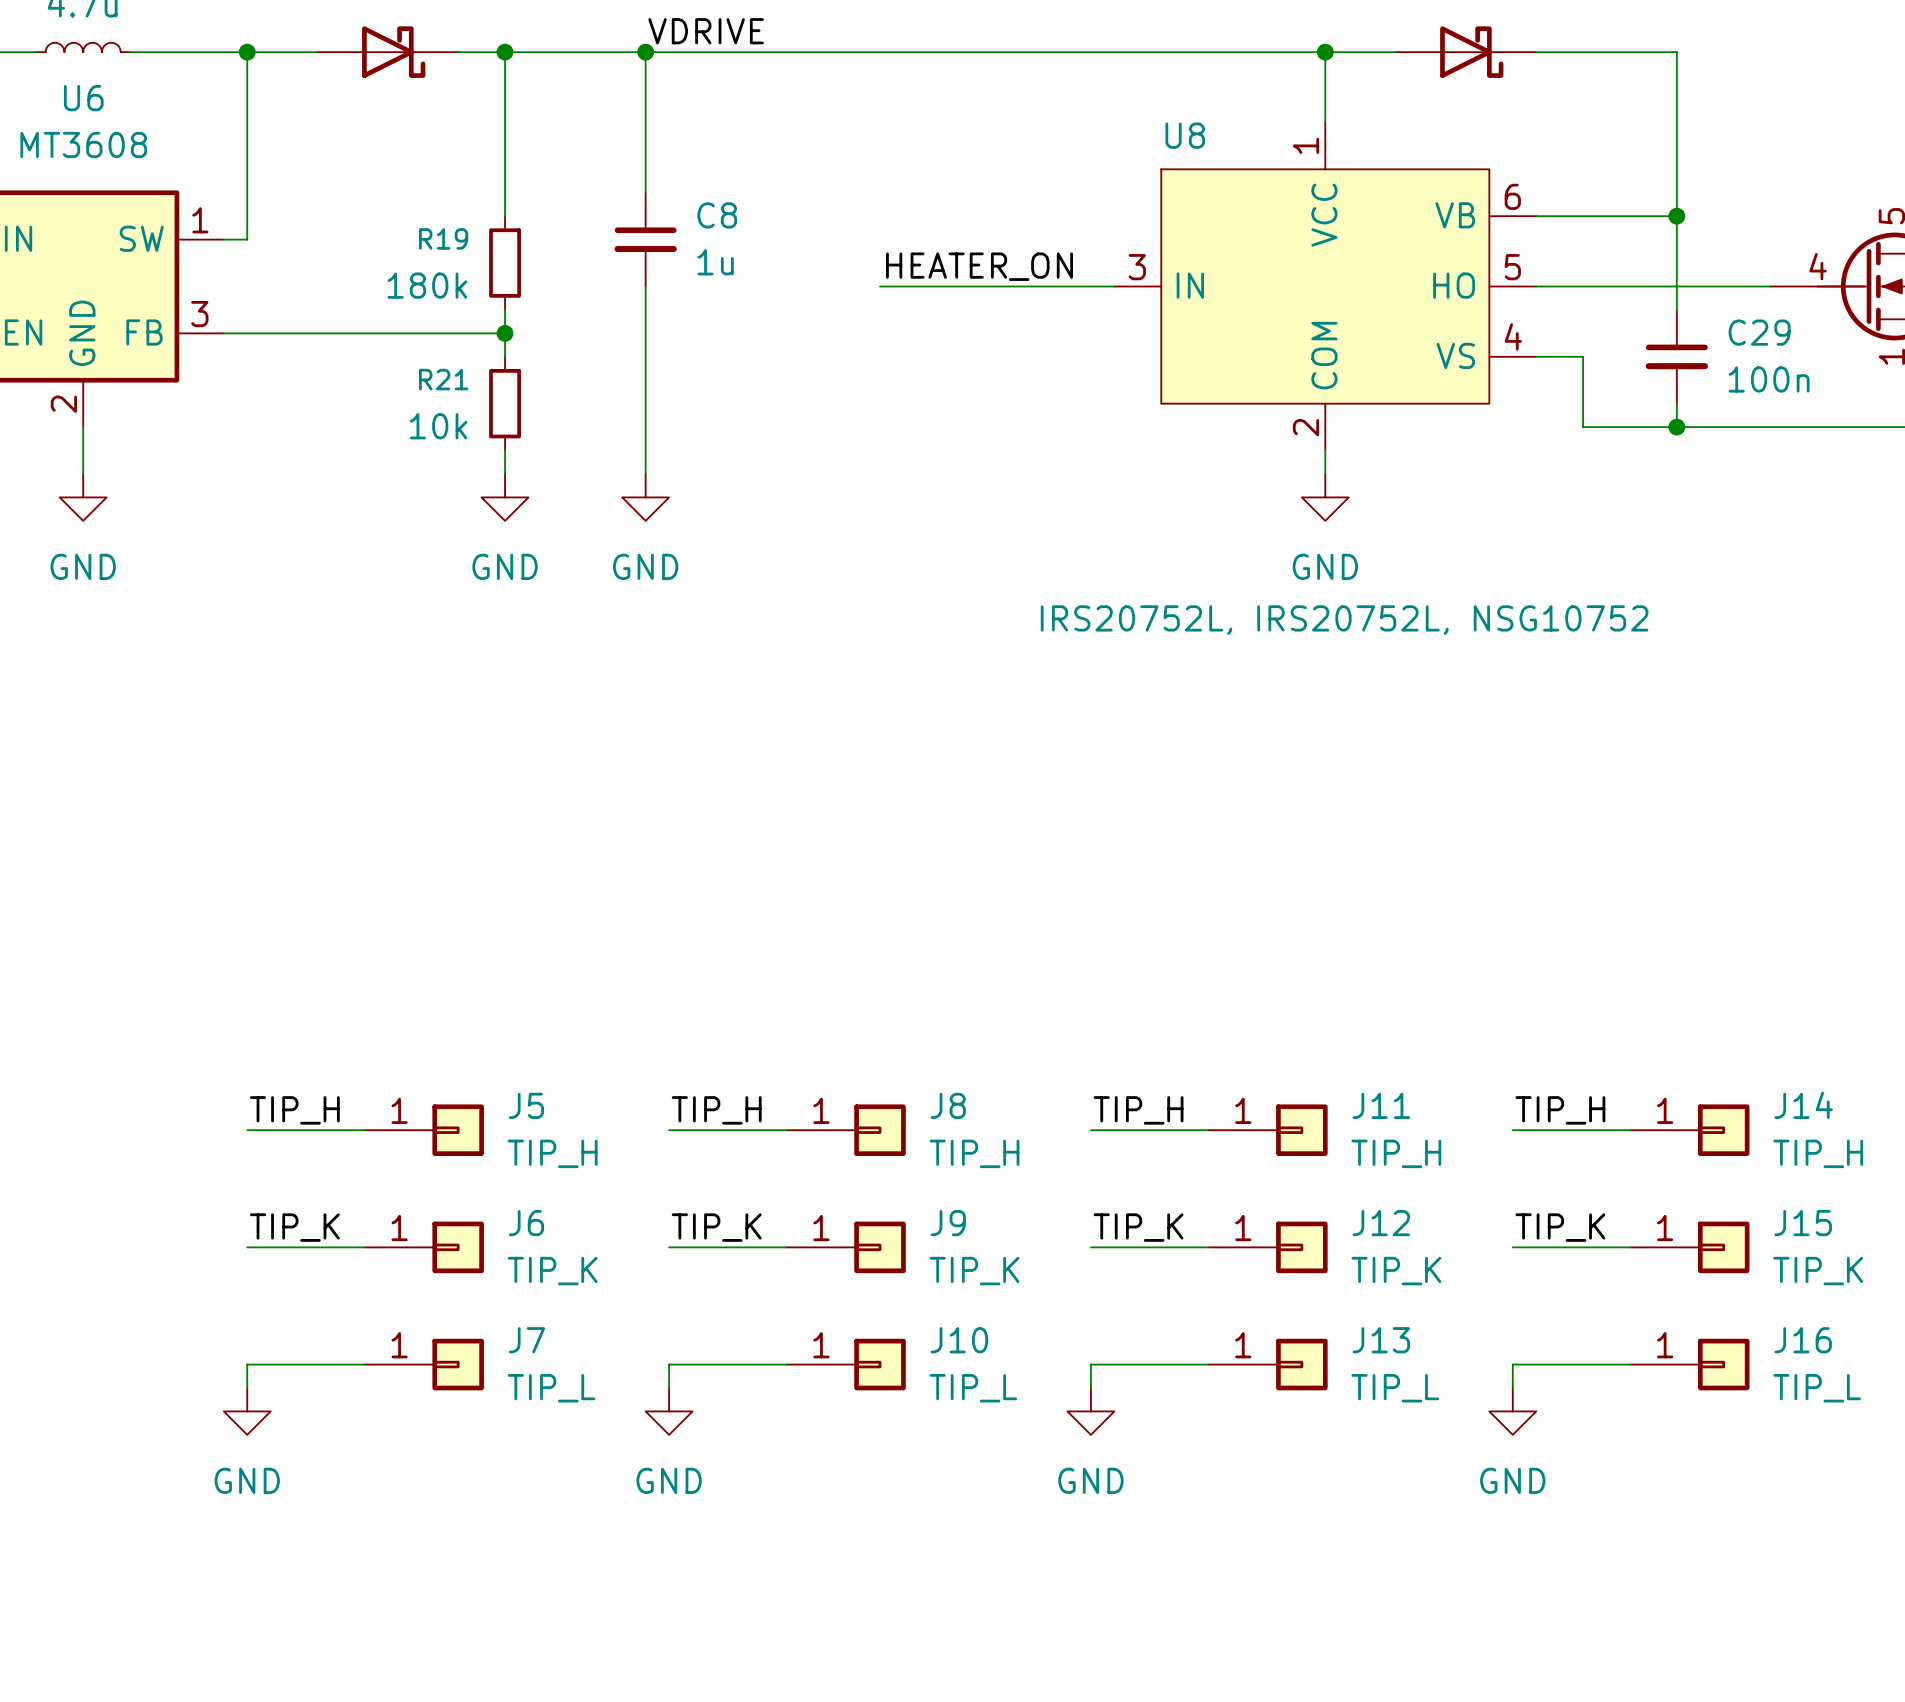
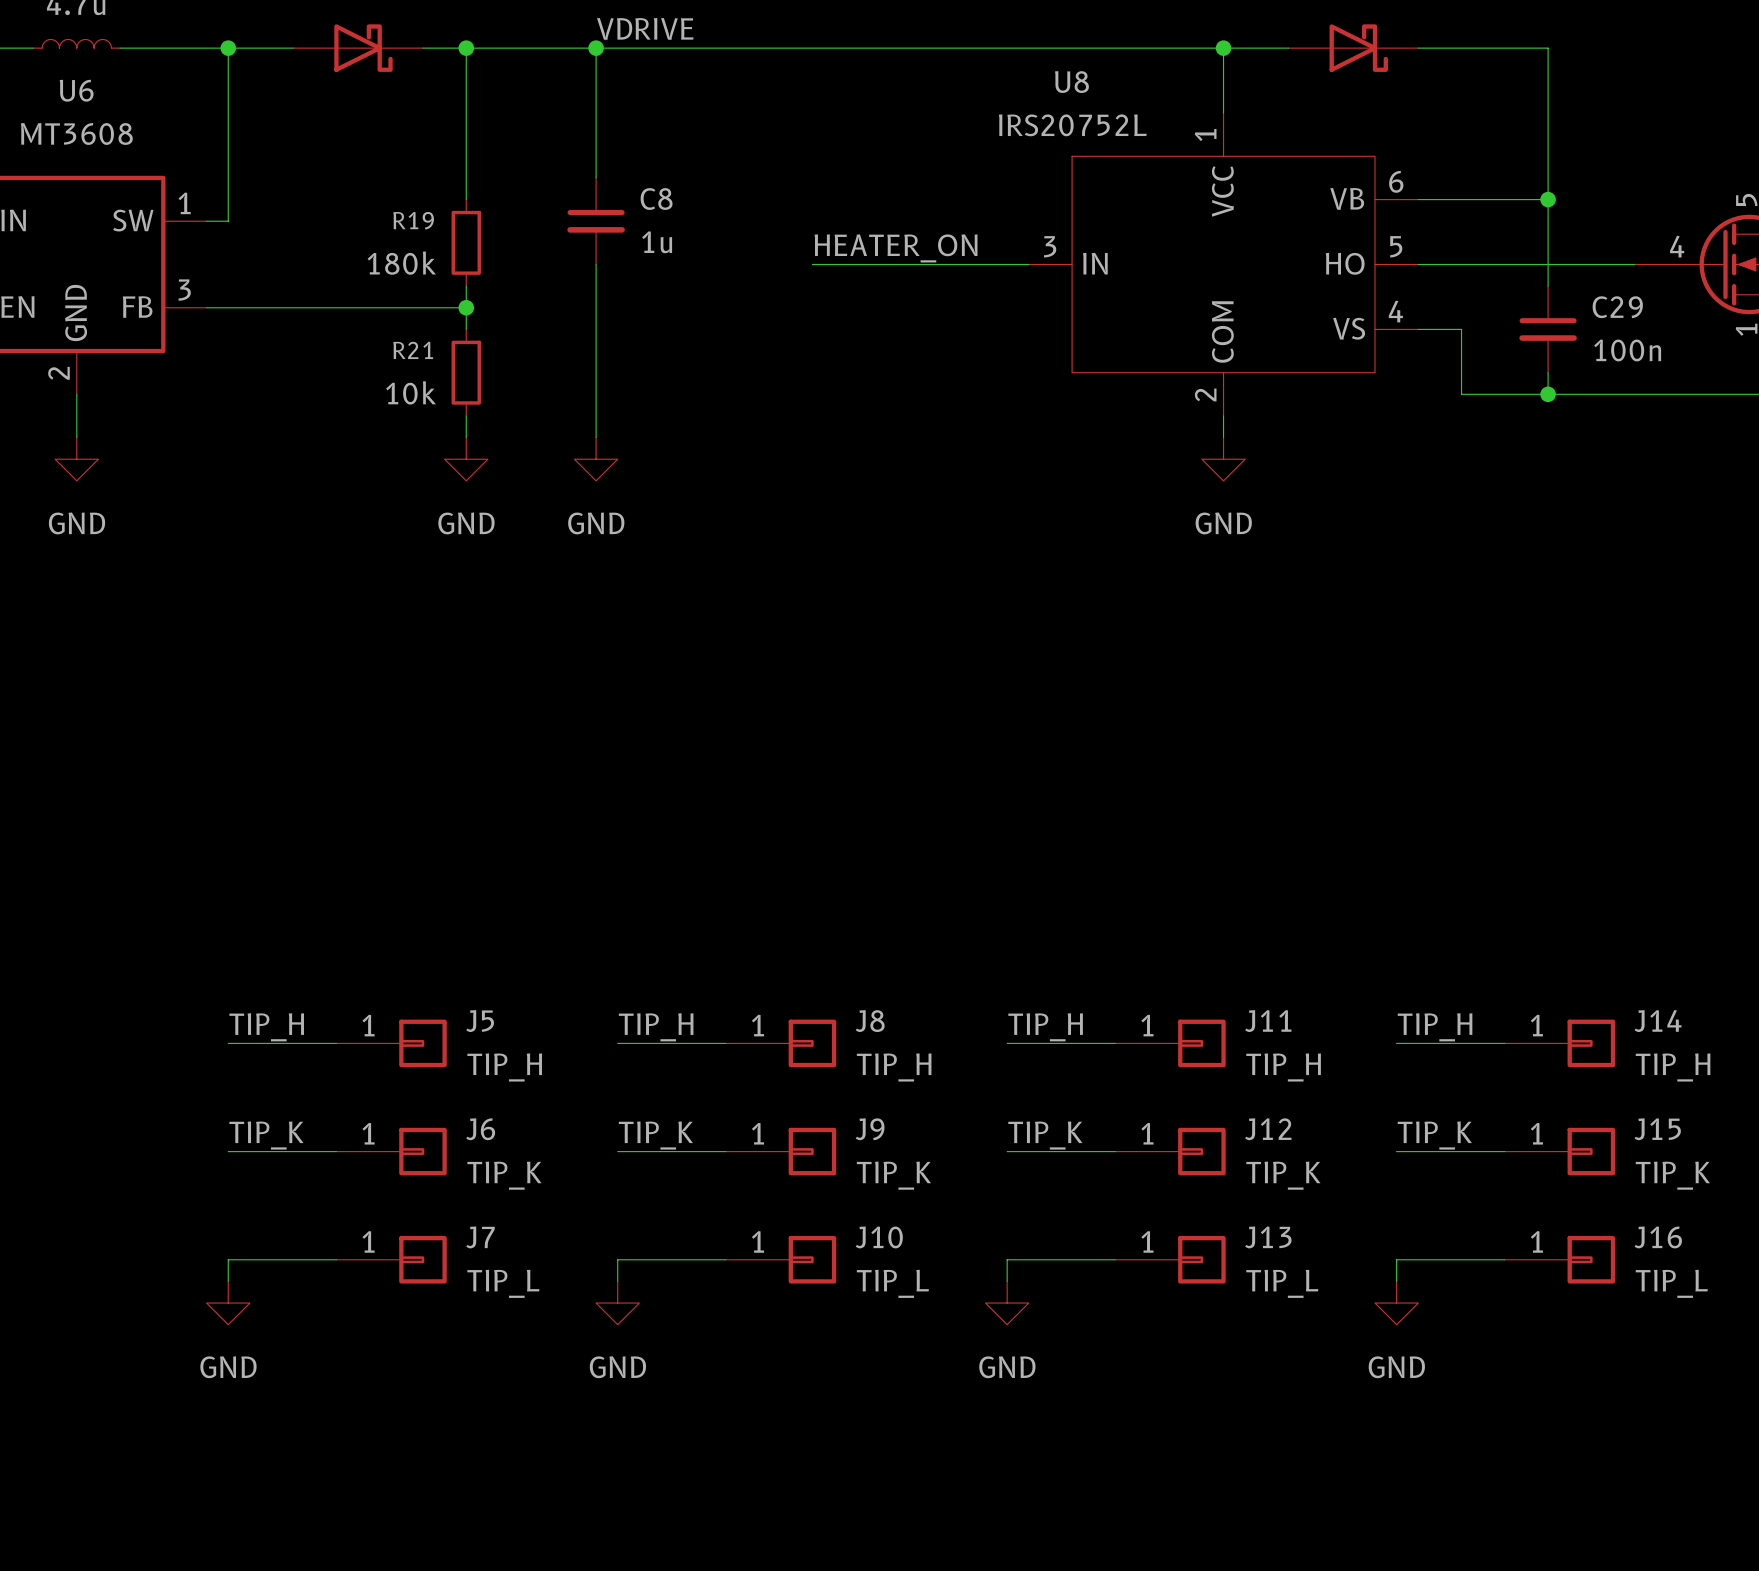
U8 name position: U8 (1185, 135) -> U8 (1071, 82)
U8 value: IRS20752L, IRS20752L, NSG10752 (1344, 620) -> IRS20752L (1072, 125)

